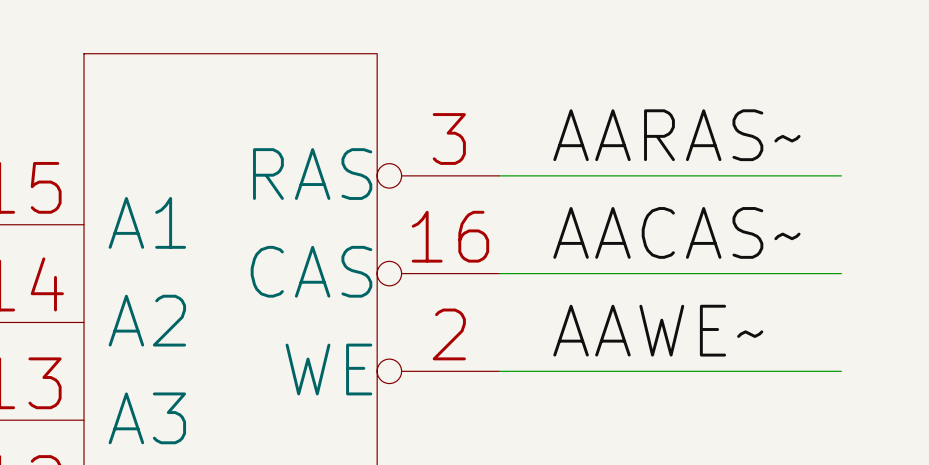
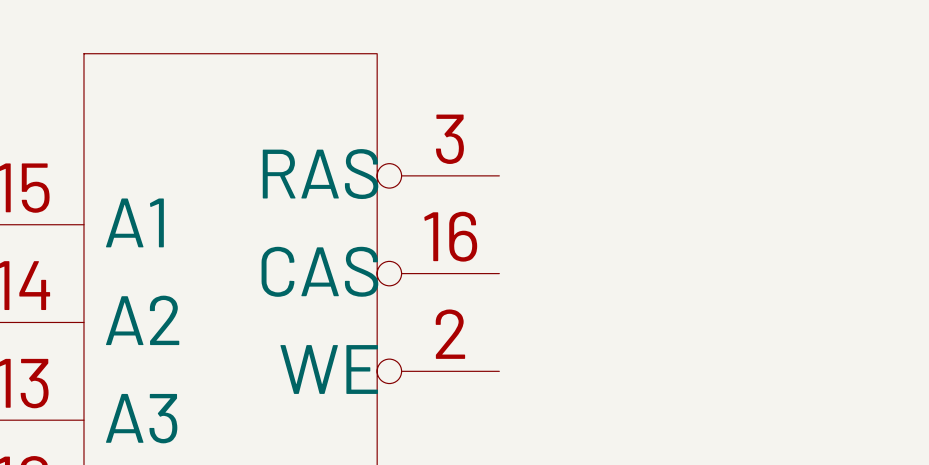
label: AARAS~ (676, 135) -> none
wire: (499, 175) (841, 175) -> none
label: AACAS~ (676, 232) -> none
wire: (499, 273) (841, 273) -> none
label: AAWE~ (658, 330) -> none
wire: (499, 371) (841, 371) -> none

